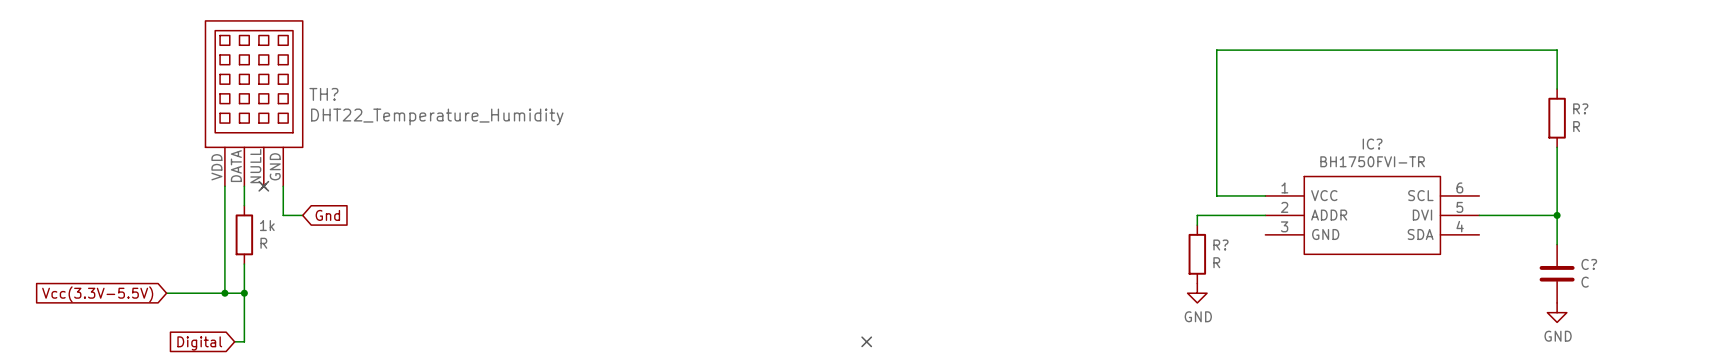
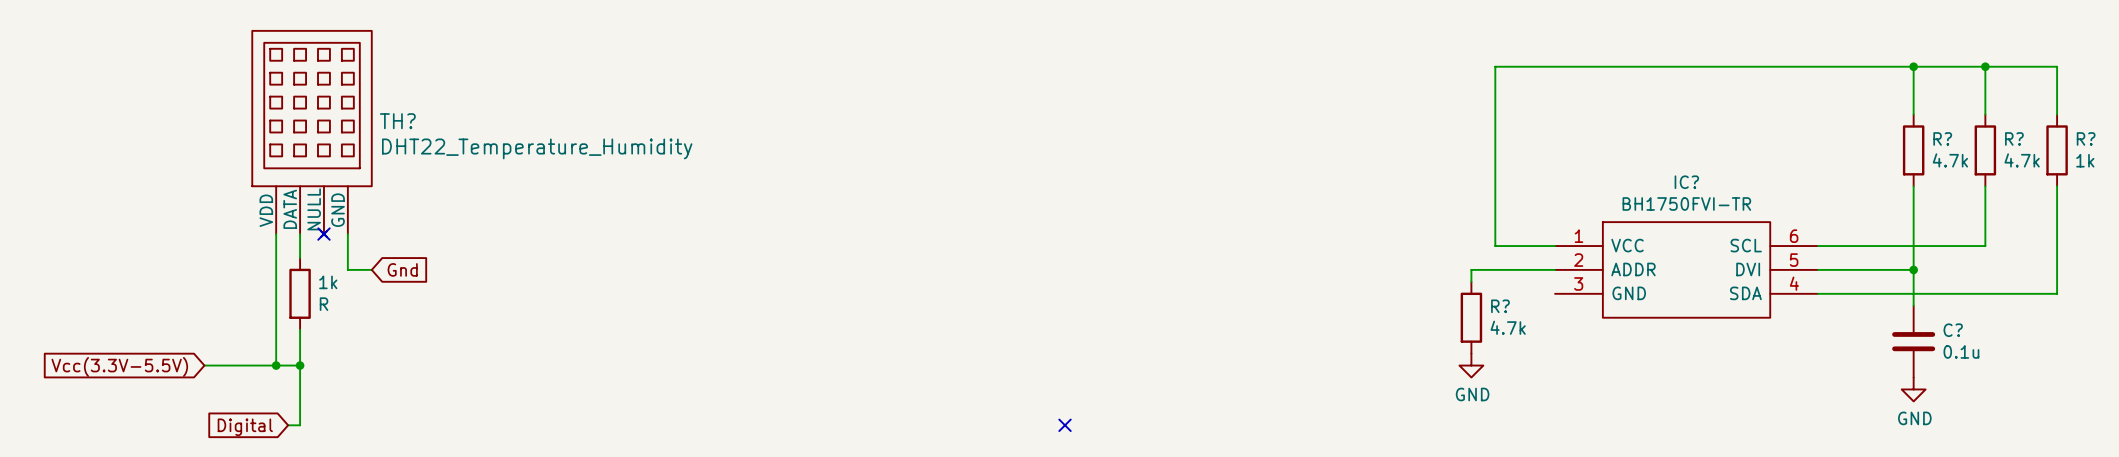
wire: none -> (1913, 66) (2057, 66) (2057, 114)
junction: none -> (1913, 66)
wire: none -> (1985, 66) (1985, 114)
junction: none -> (1985, 66)
R?: none -> 4.7k (1985, 150)
R?: none -> 1k (2057, 150)
R? value: R (1576, 126) -> 4.7k (1950, 160)
wire: none -> (1985, 186) (1985, 246) (1818, 246)
wire: none -> (2057, 186) (2057, 293) (1818, 293)
R? value: R (1216, 262) -> 4.7k (1508, 327)
C? value: C (1585, 282) -> 0.1u (1961, 351)

